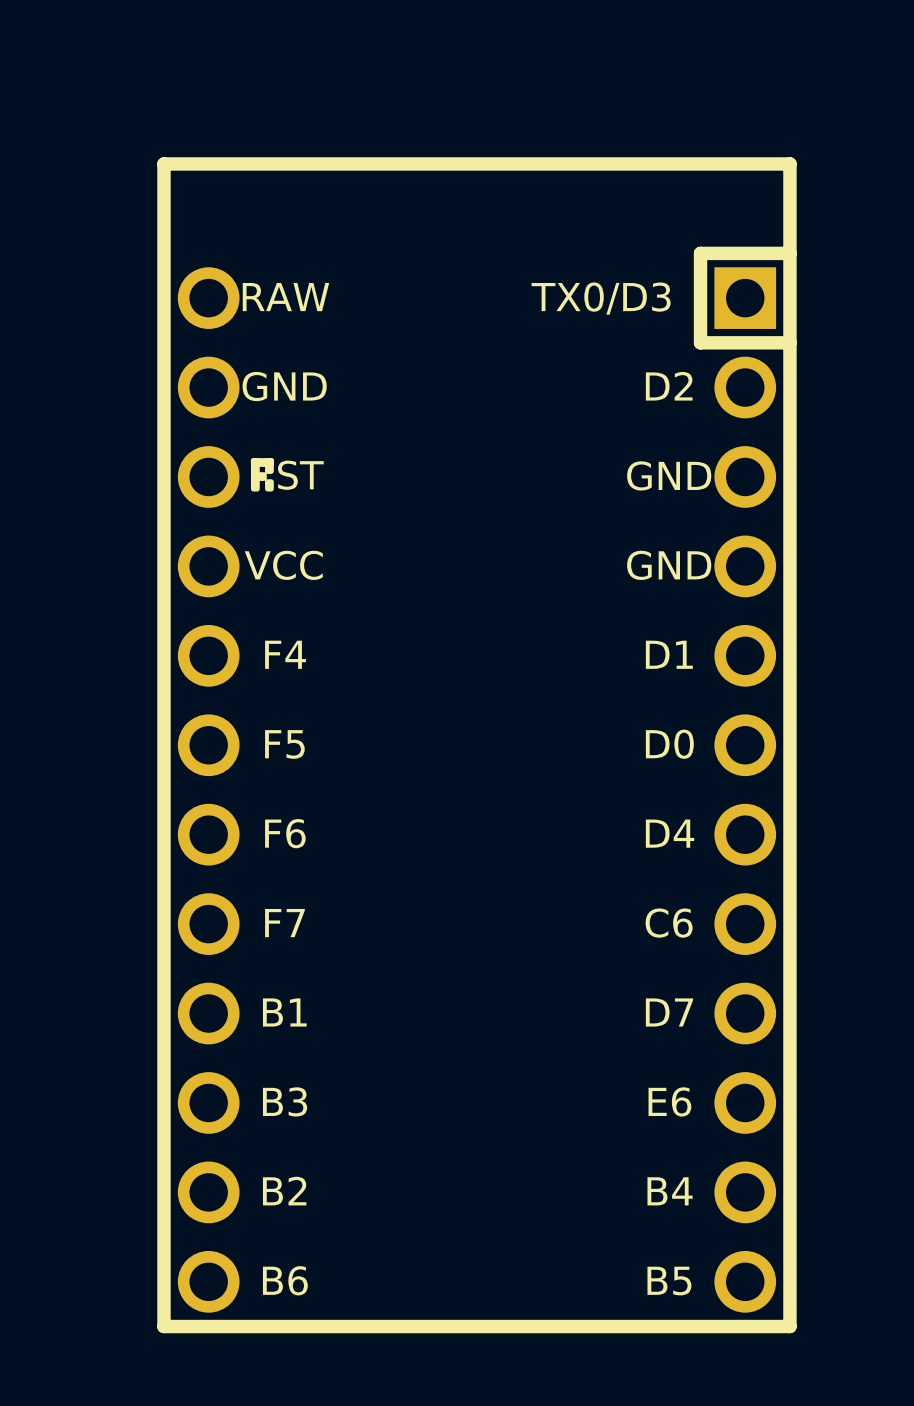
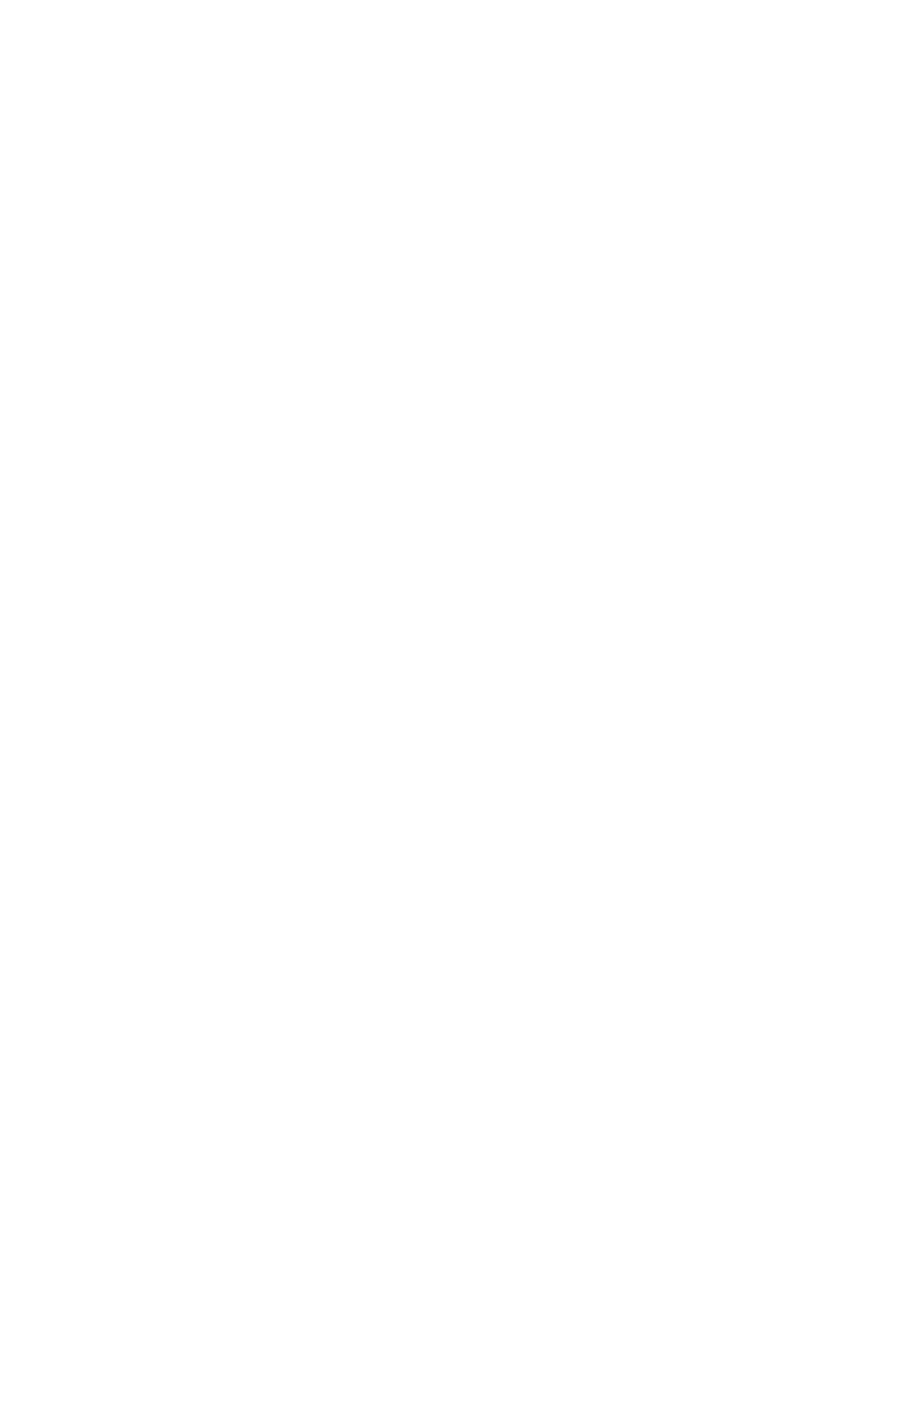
part: (476, 745) -> none

